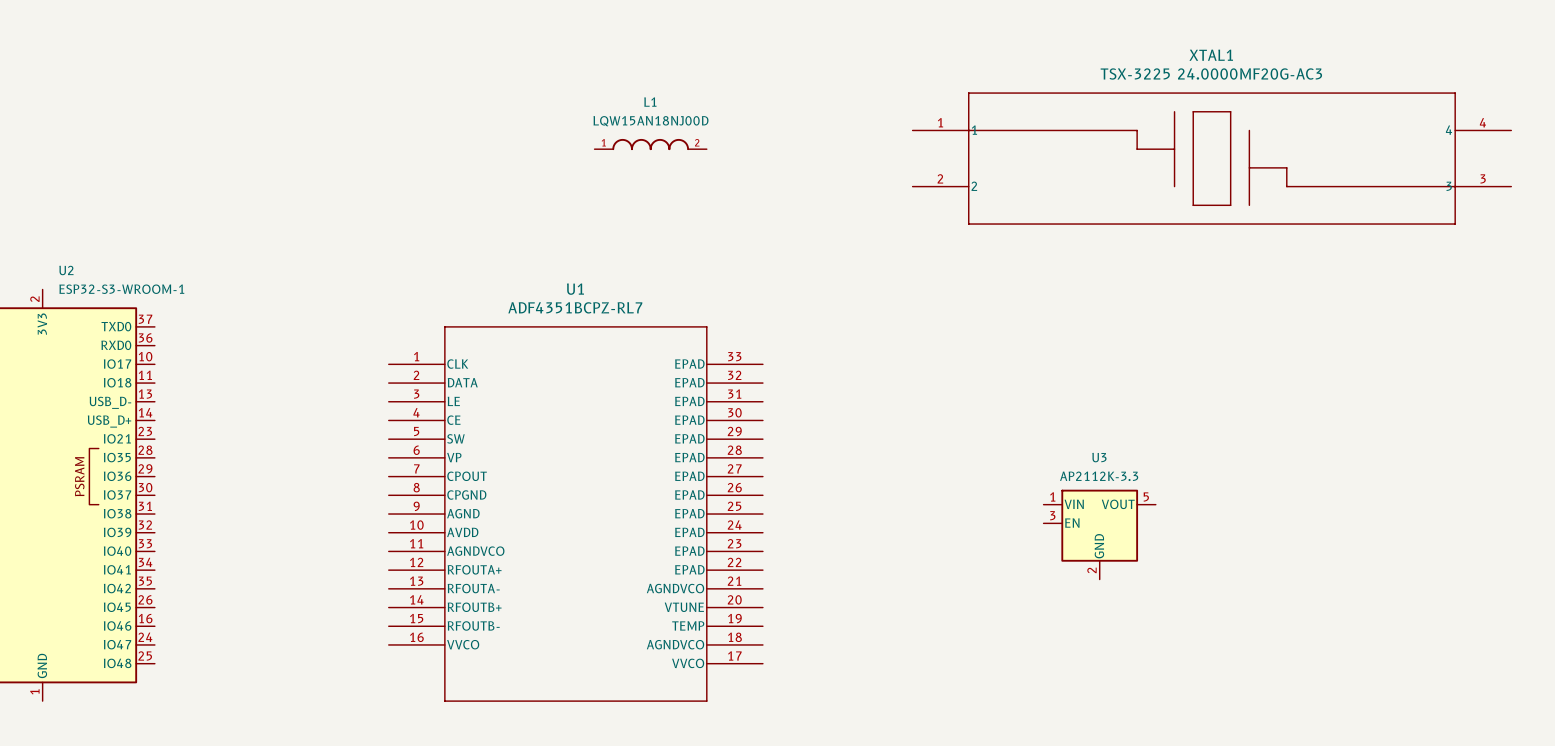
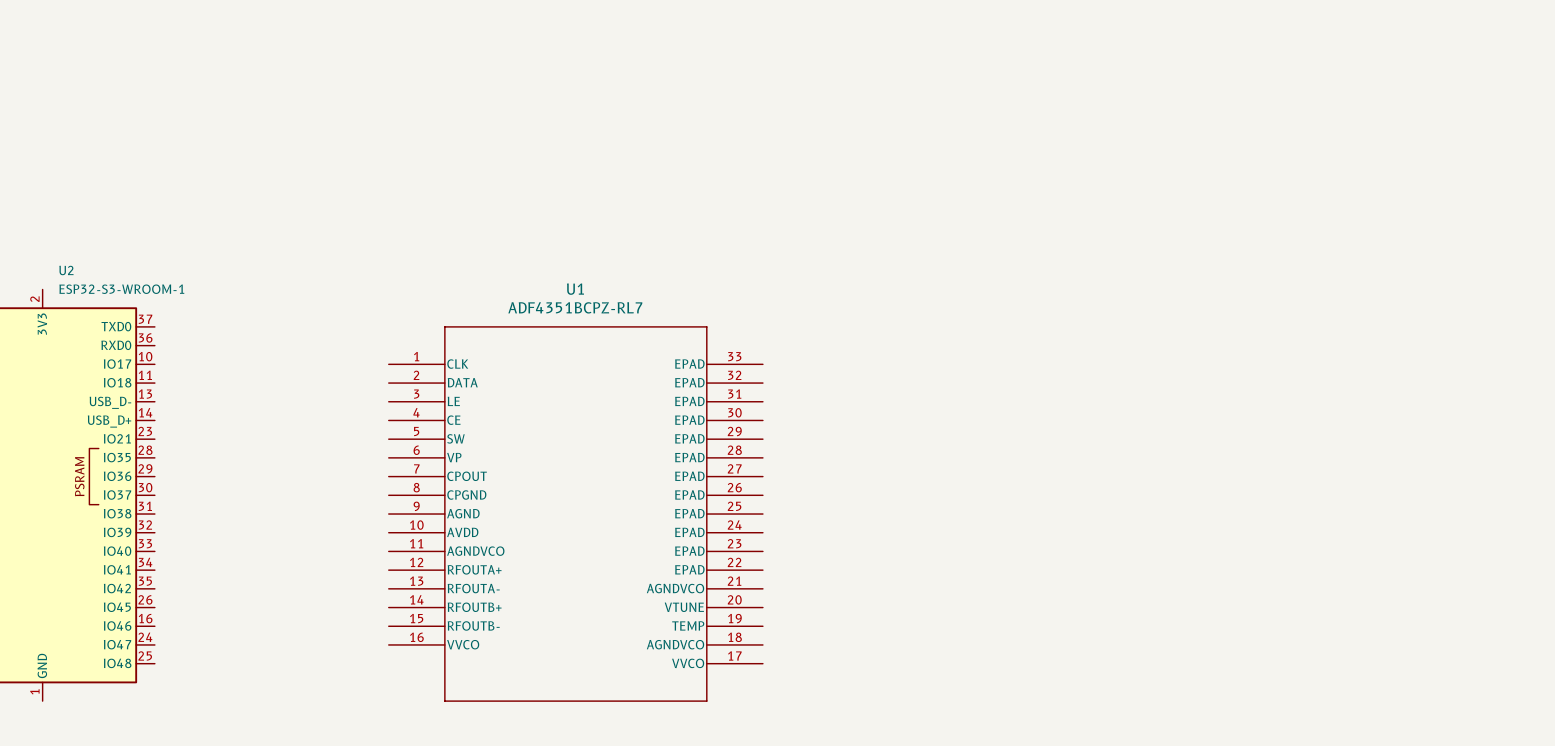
L1: LQW15AN18NJ00D (650, 144) -> none
XTAL1: TSX-3225 24.0000MF20G-AC3 (1211, 158) -> none
U3: AP2112K-3.3 (1099, 534) -> none

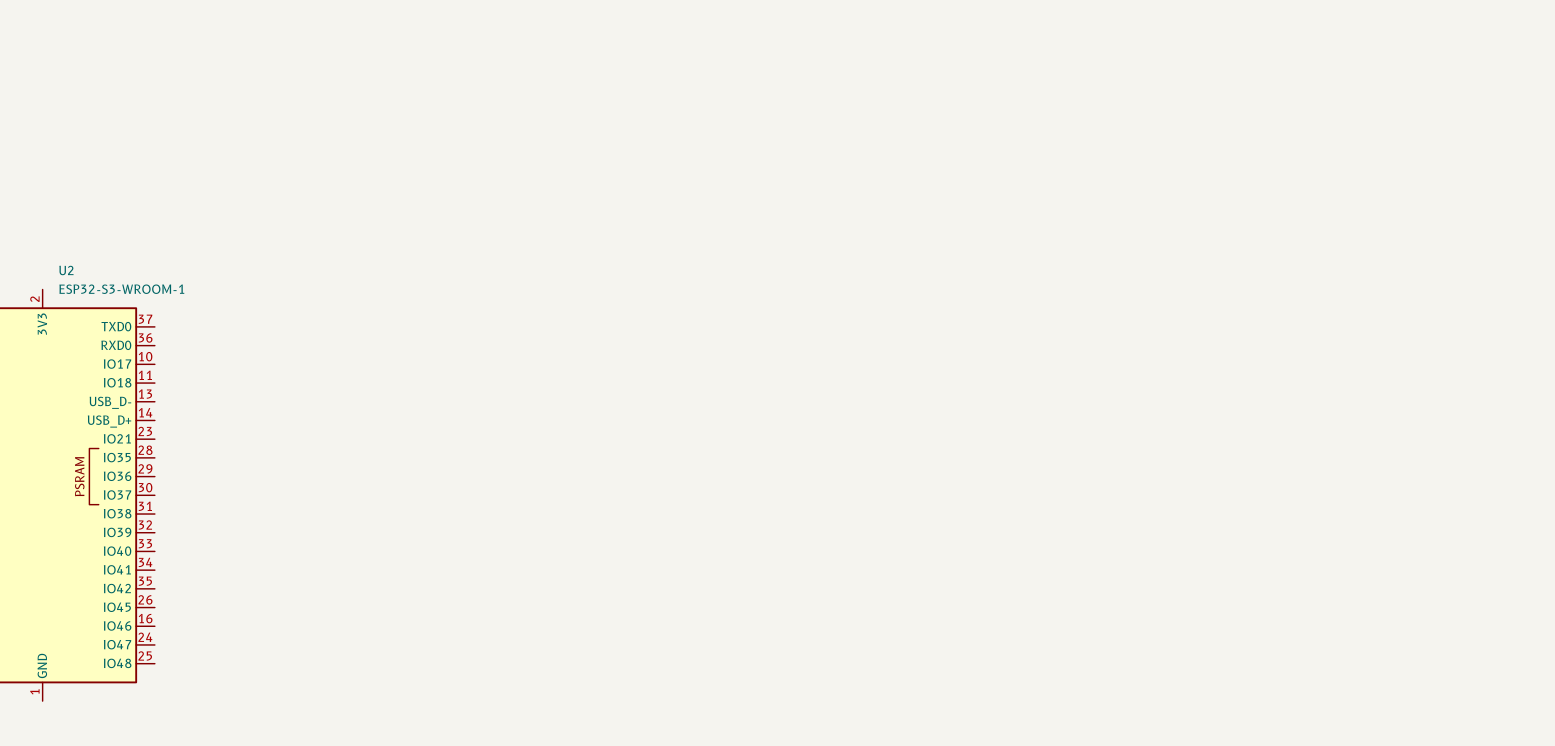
U1: ADF4351BCPZ-RL7 (575, 514) -> none

